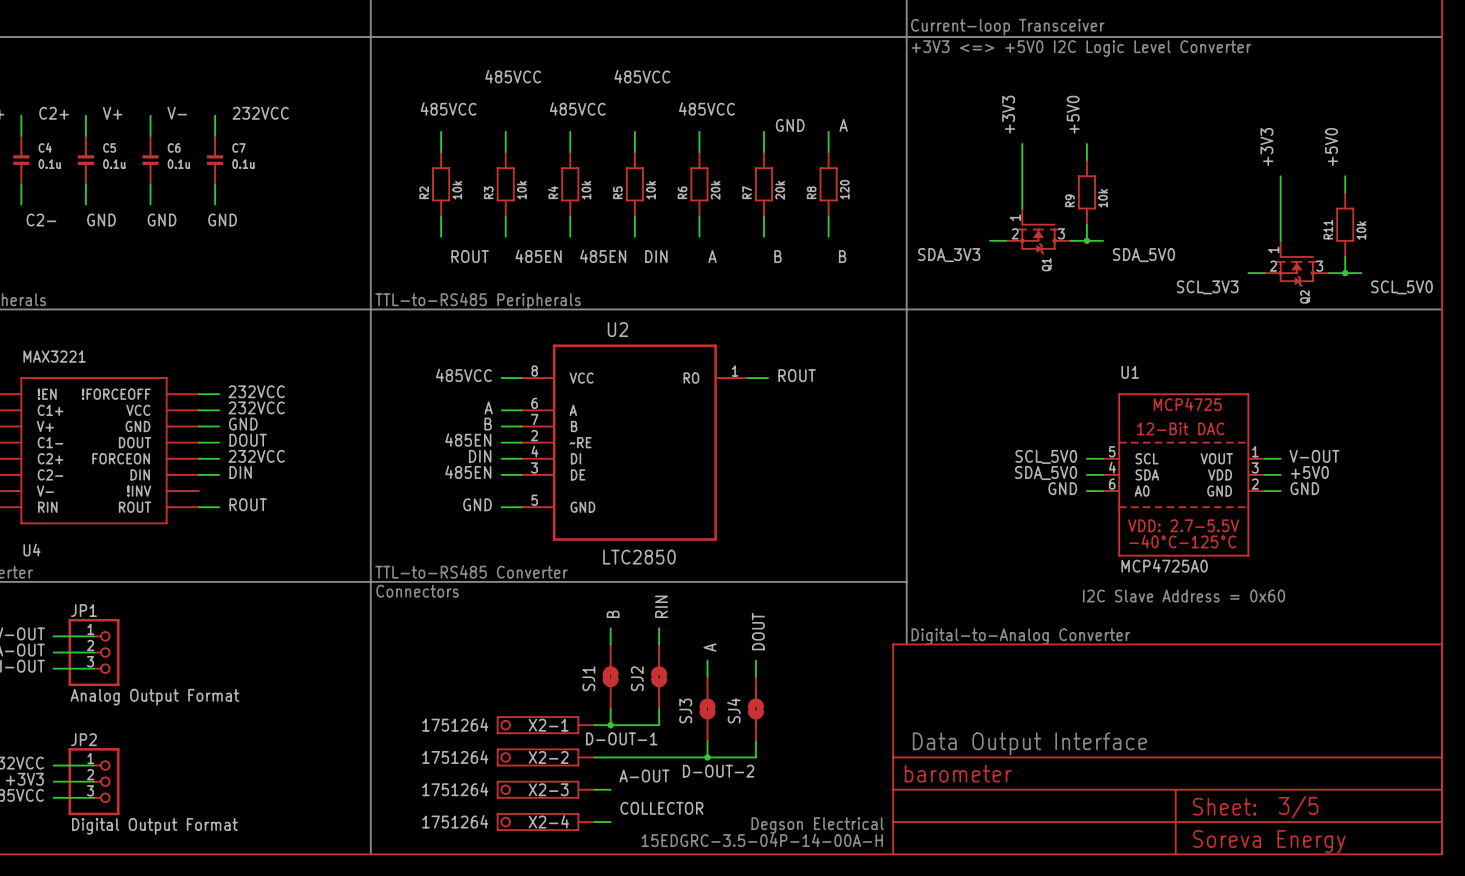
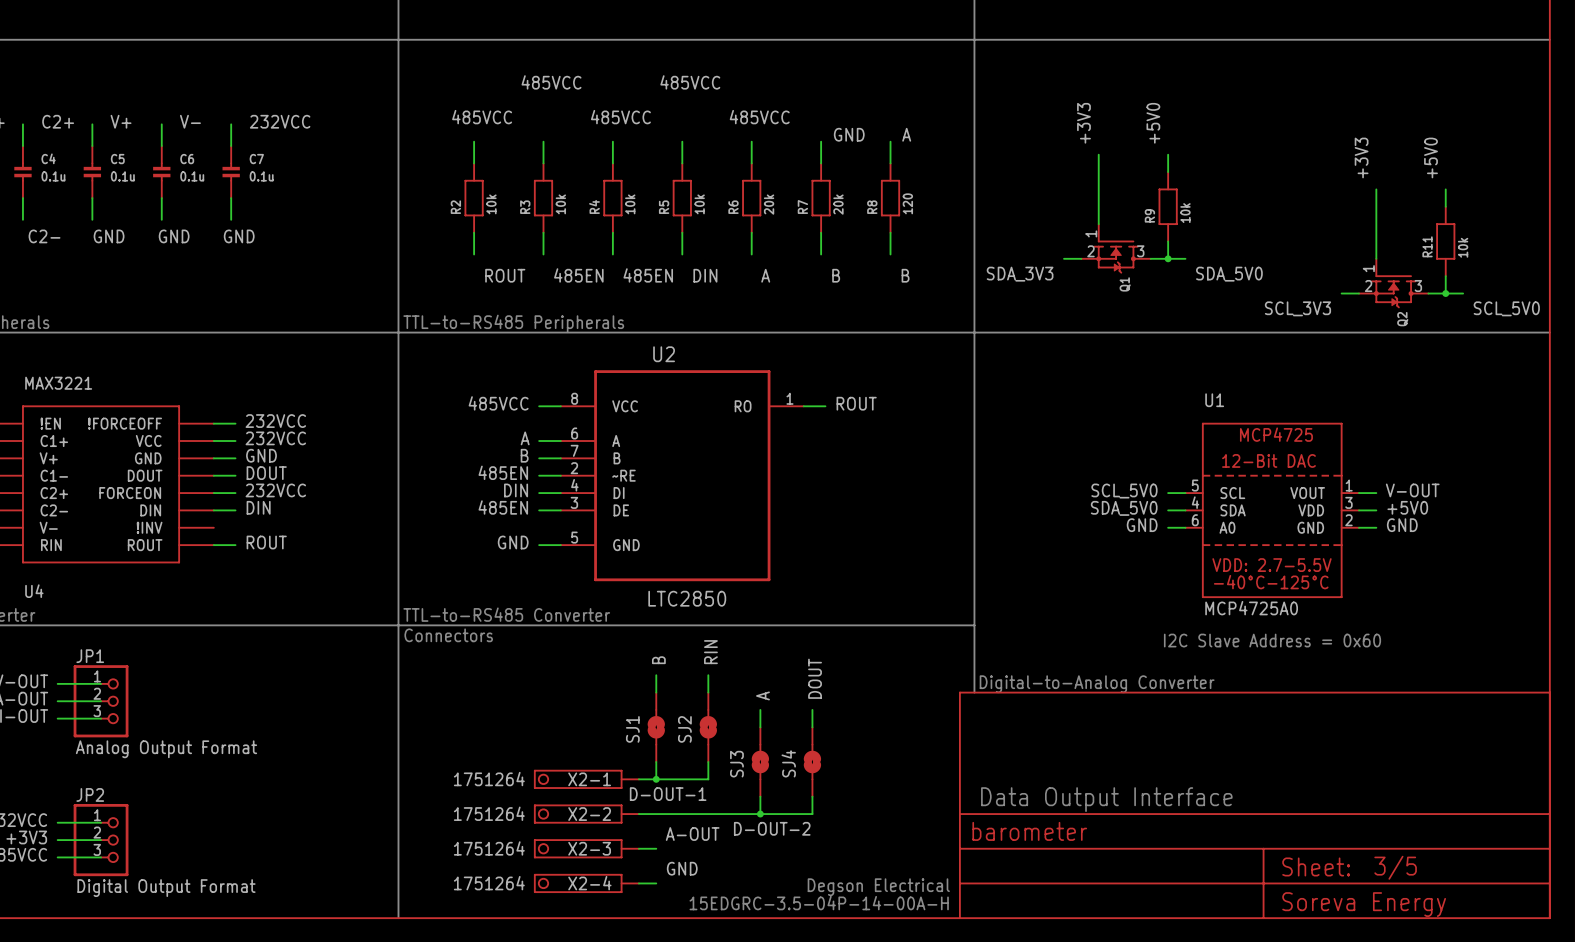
text: Current-loop Transceiver (1007, 27) -> none
text: +3V3 <=> +5V0 I2C Logic Level Converter (1081, 48) -> none
label: COLLECTOR (661, 808) -> GND (682, 868)

